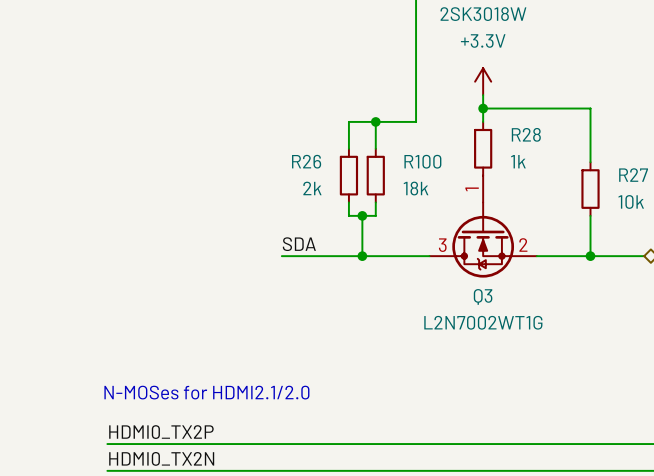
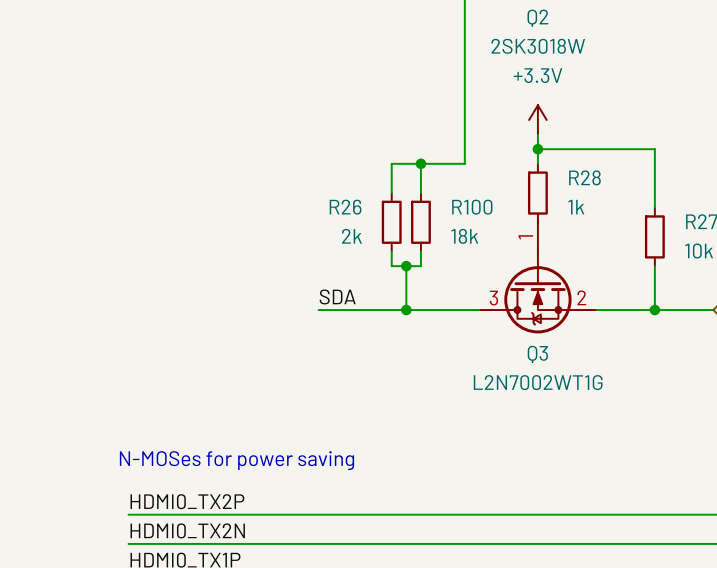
text: N-MOSes for HDMI2.1/2.0 (206, 392) -> N-MOSes for power saving (236, 460)

